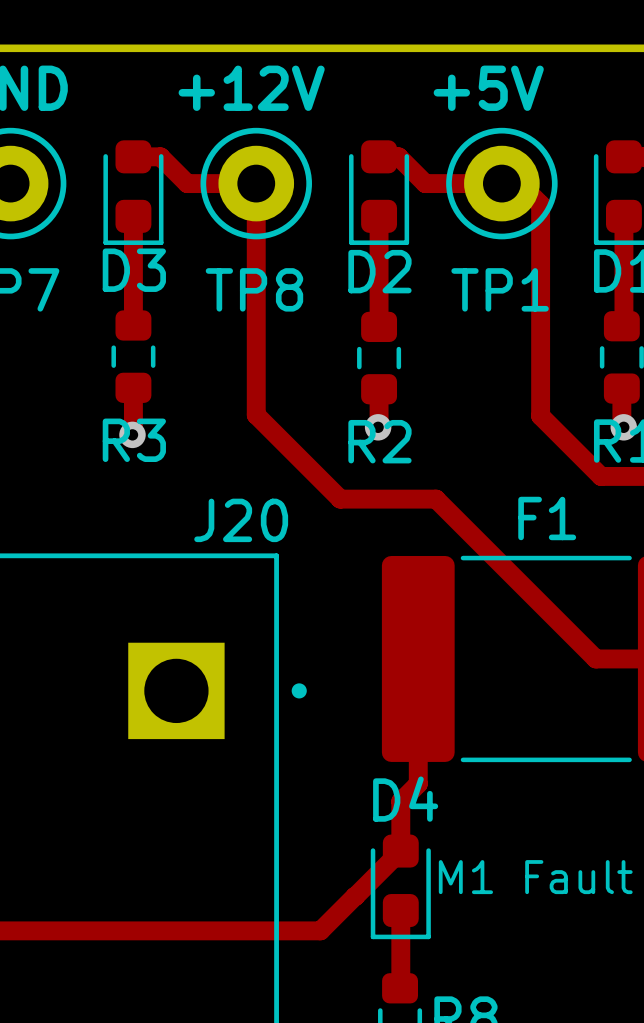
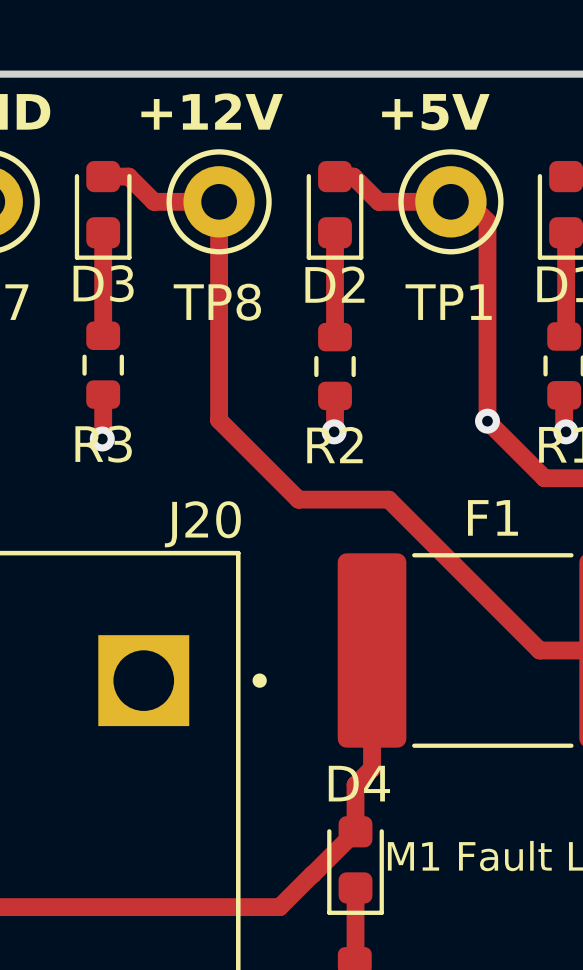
via: none -> (487, 421)

